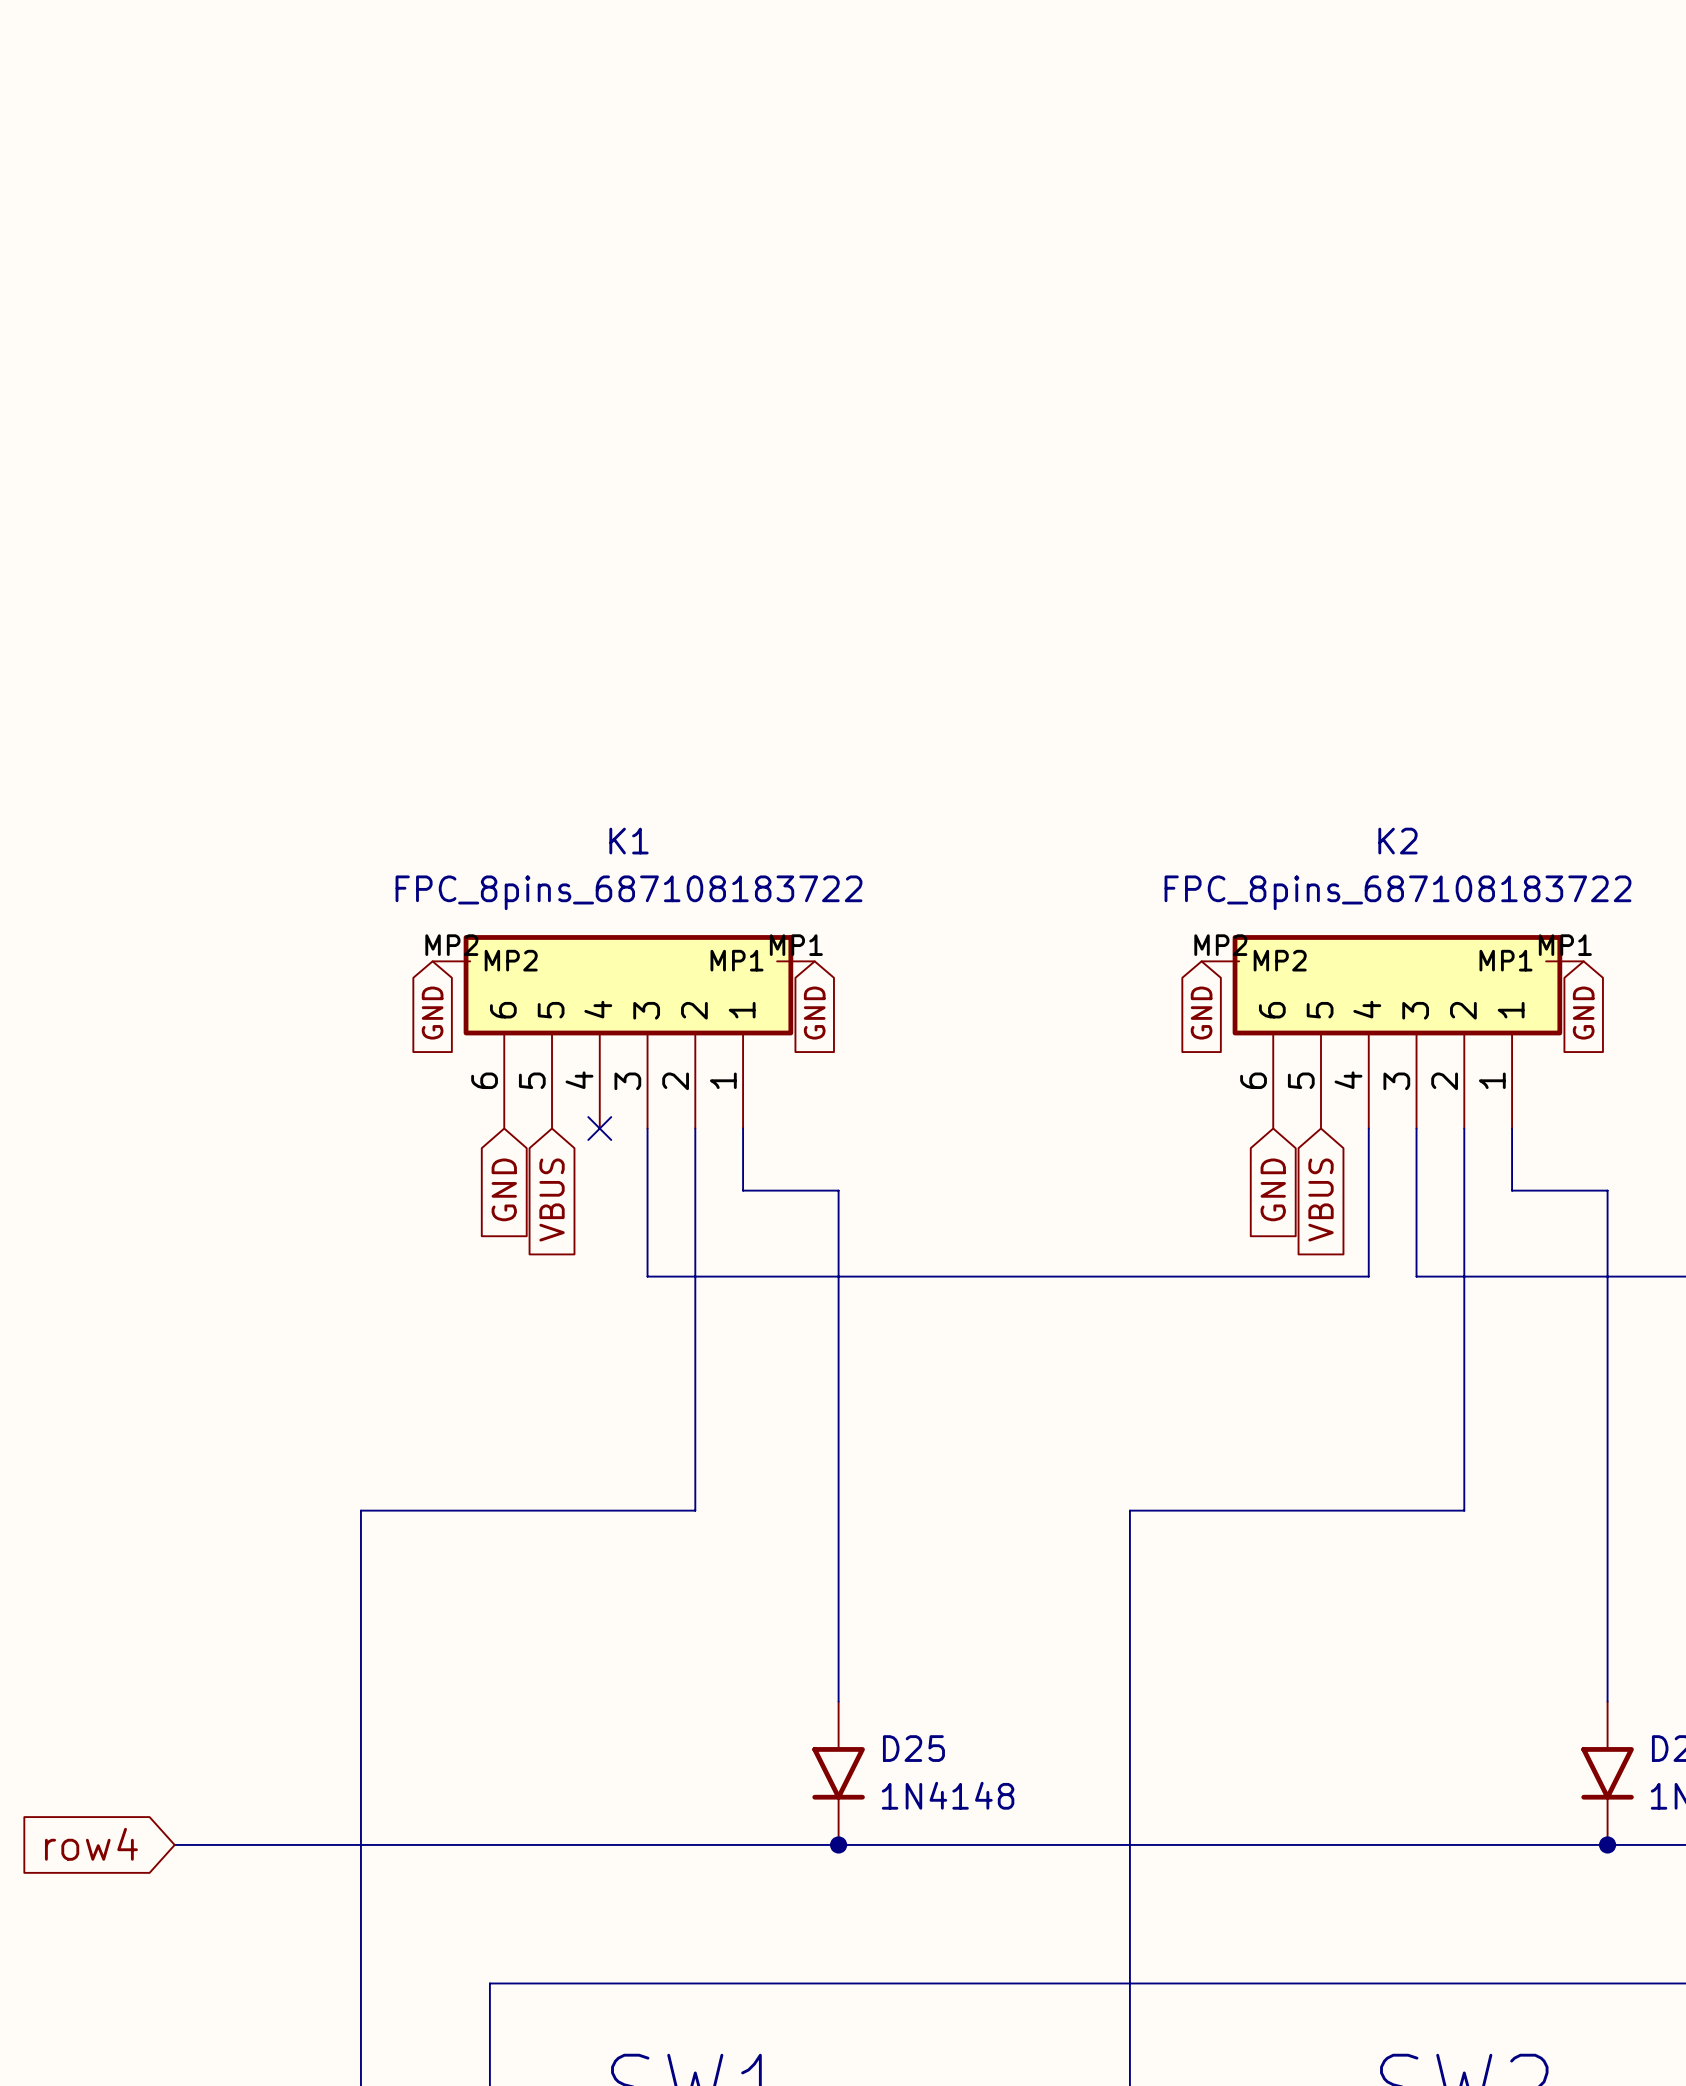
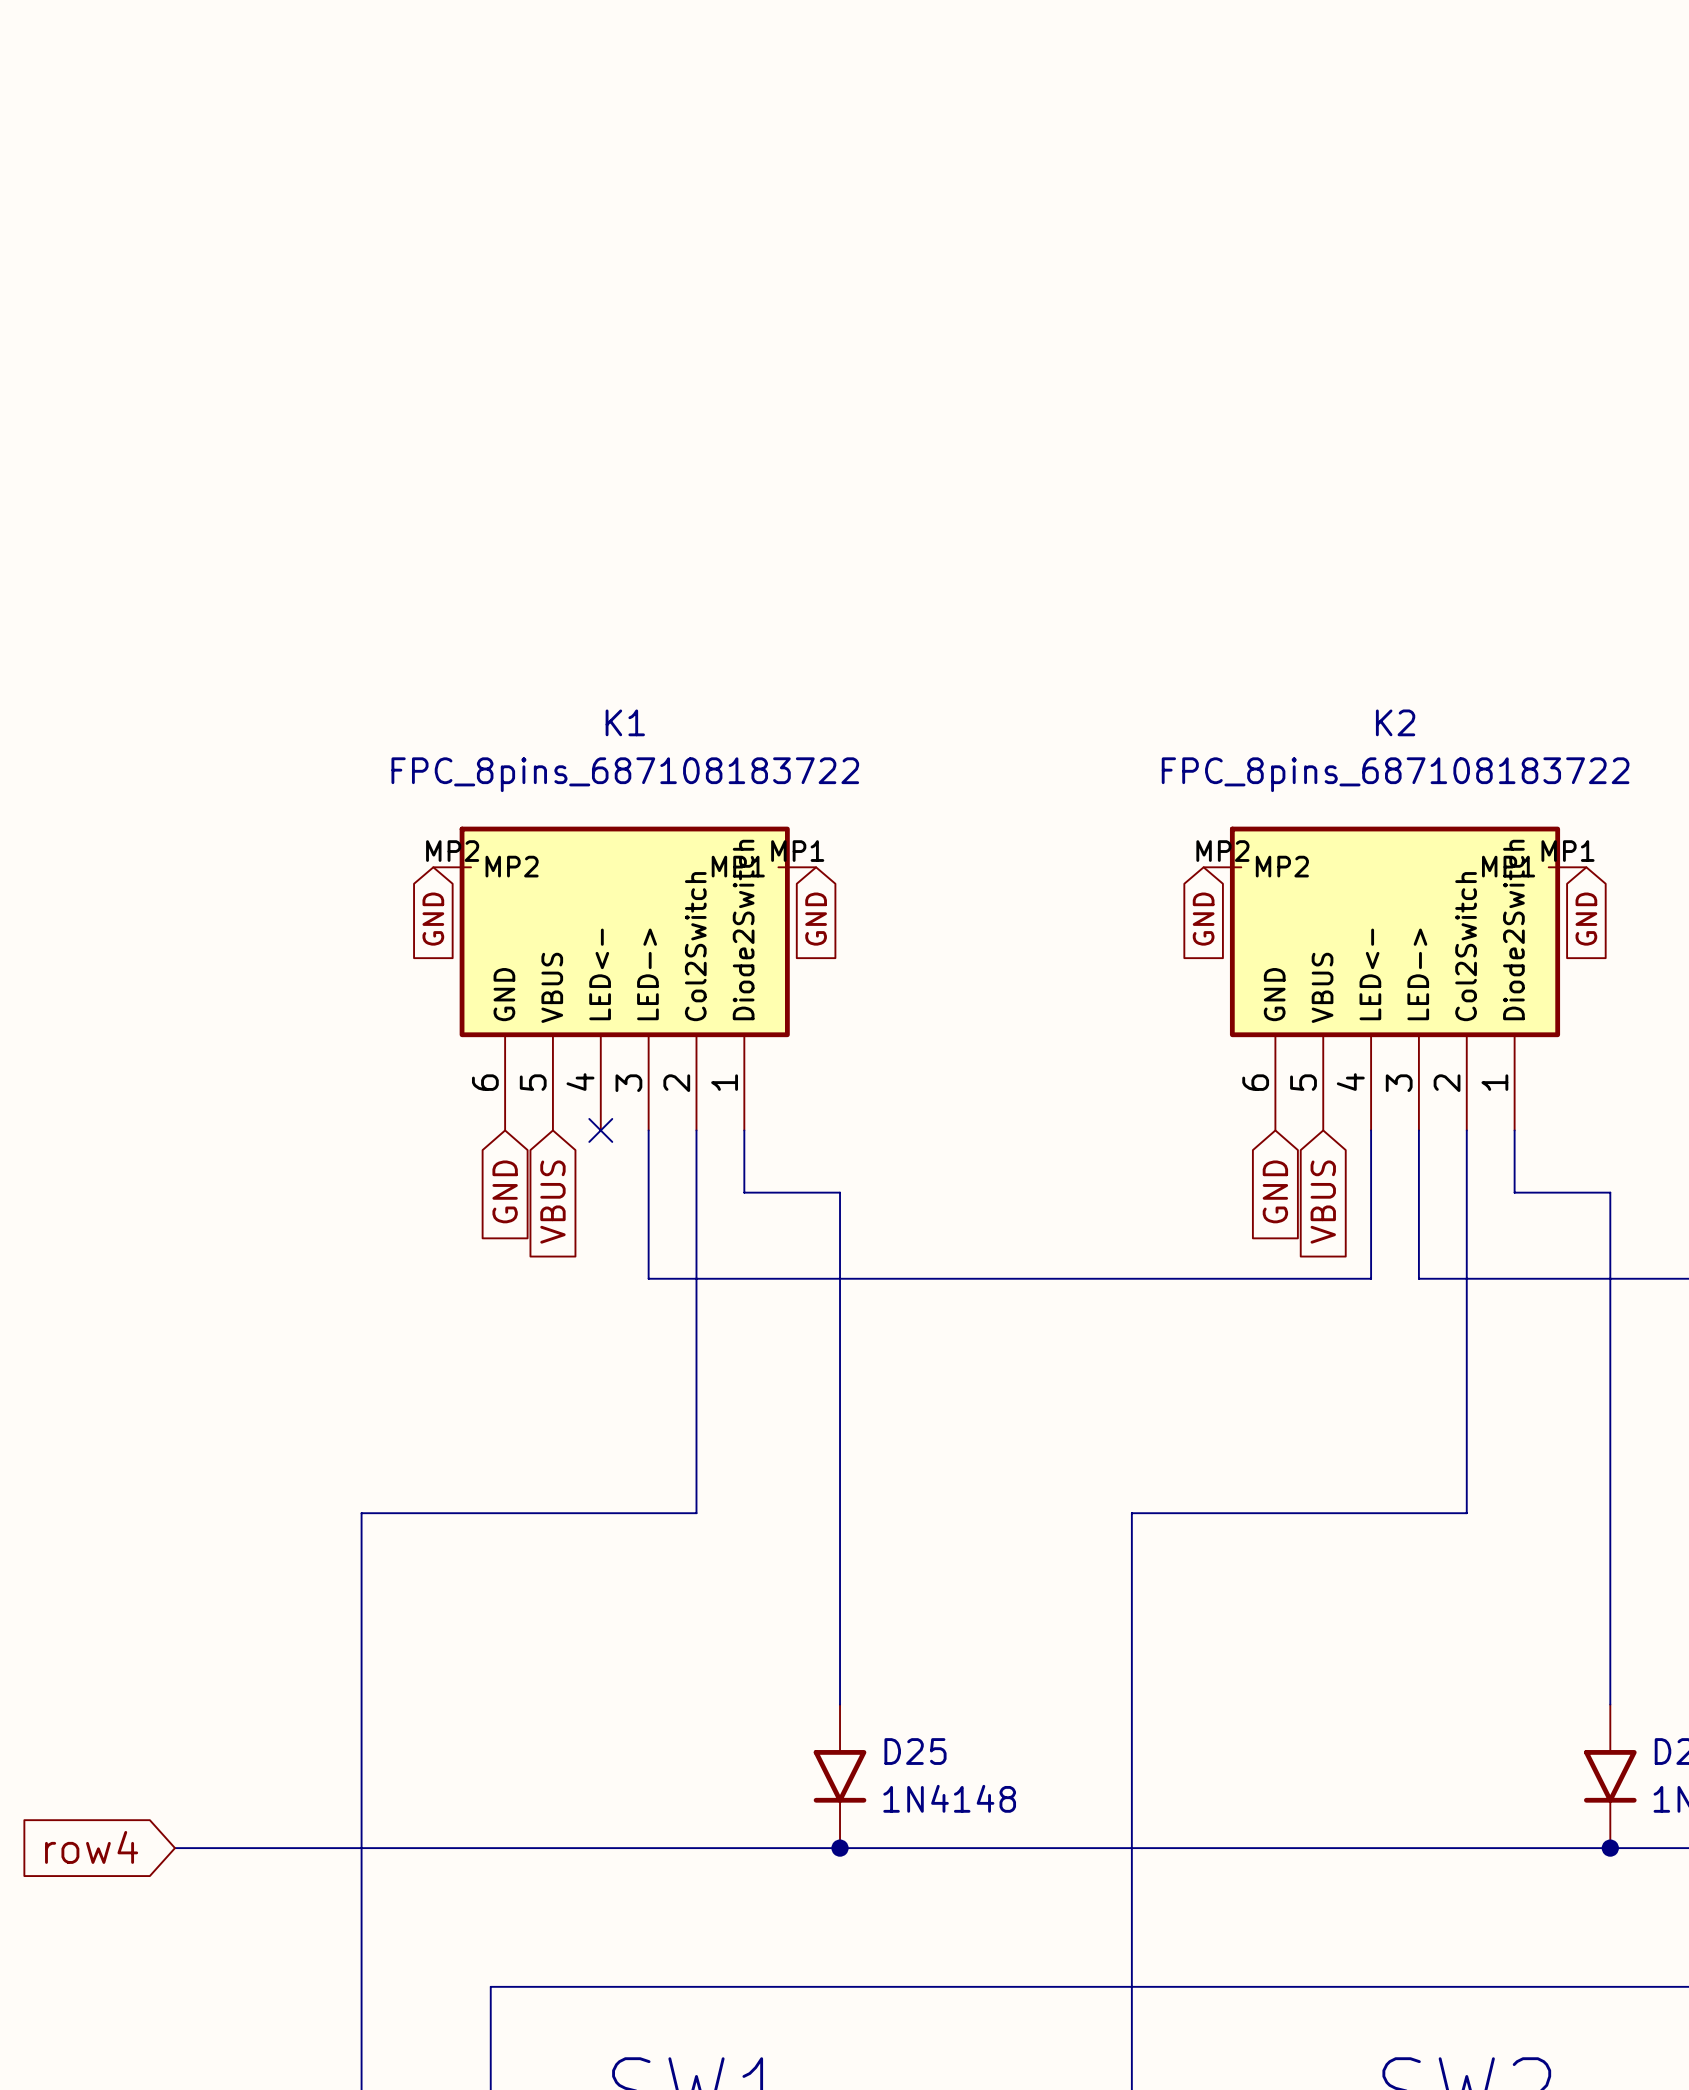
K1 name position: K1 (629, 841) -> K1 (625, 722)
K2 name position: K2 (1397, 841) -> K2 (1395, 722)
K1 value position: FPC_8pins_687108183722 (629, 892) -> FPC_8pins_687108183722 (625, 774)
K2 value position: FPC_8pins_687108183722 (1397, 892) -> FPC_8pins_687108183722 (1395, 774)
K1 symbol: [432, 935, 815, 1129] -> [433, 826, 817, 1131]
K2 symbol: [1201, 935, 1584, 1129] -> [1203, 826, 1587, 1131]
global label position: GND (432, 1013) -> GND (433, 919)
global label position: GND (814, 1013) -> GND (816, 919)
global label position: GND (1201, 1013) -> GND (1203, 919)
global label position: GND (1583, 1013) -> GND (1586, 919)

